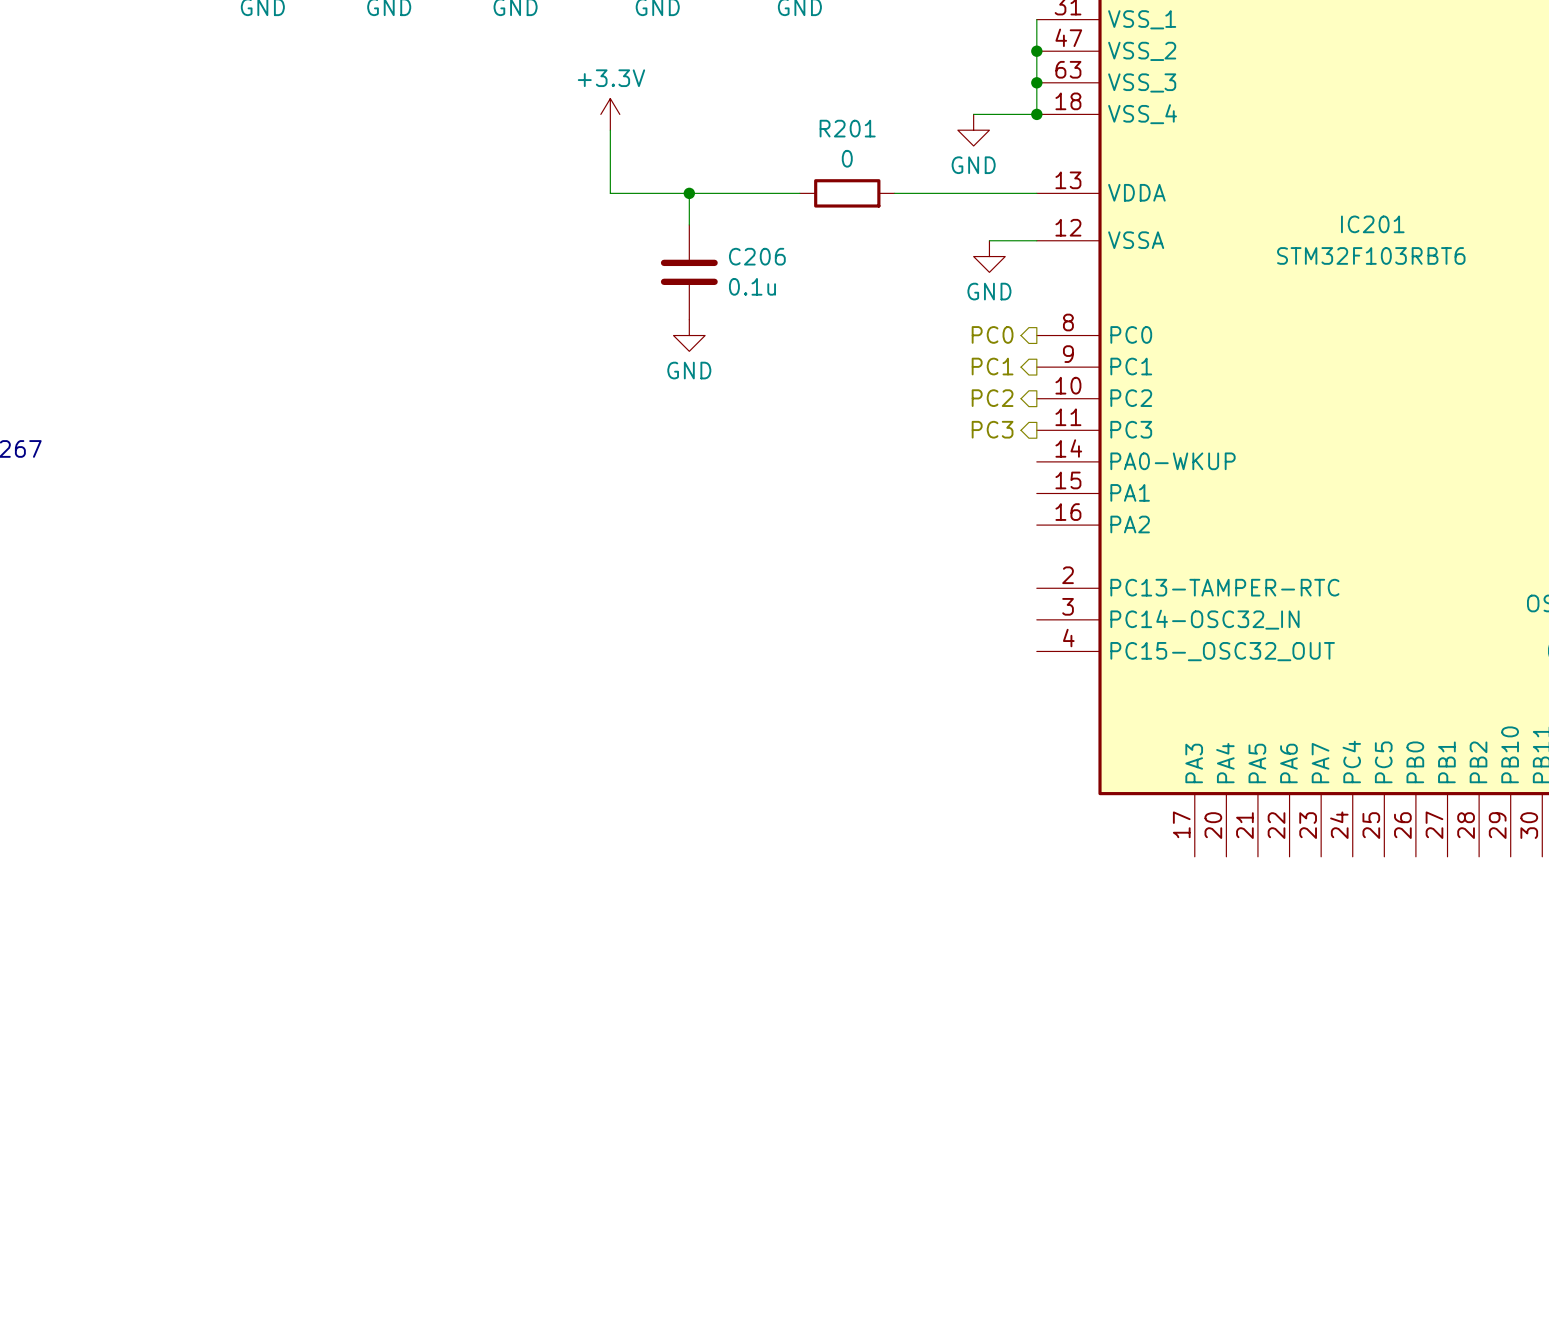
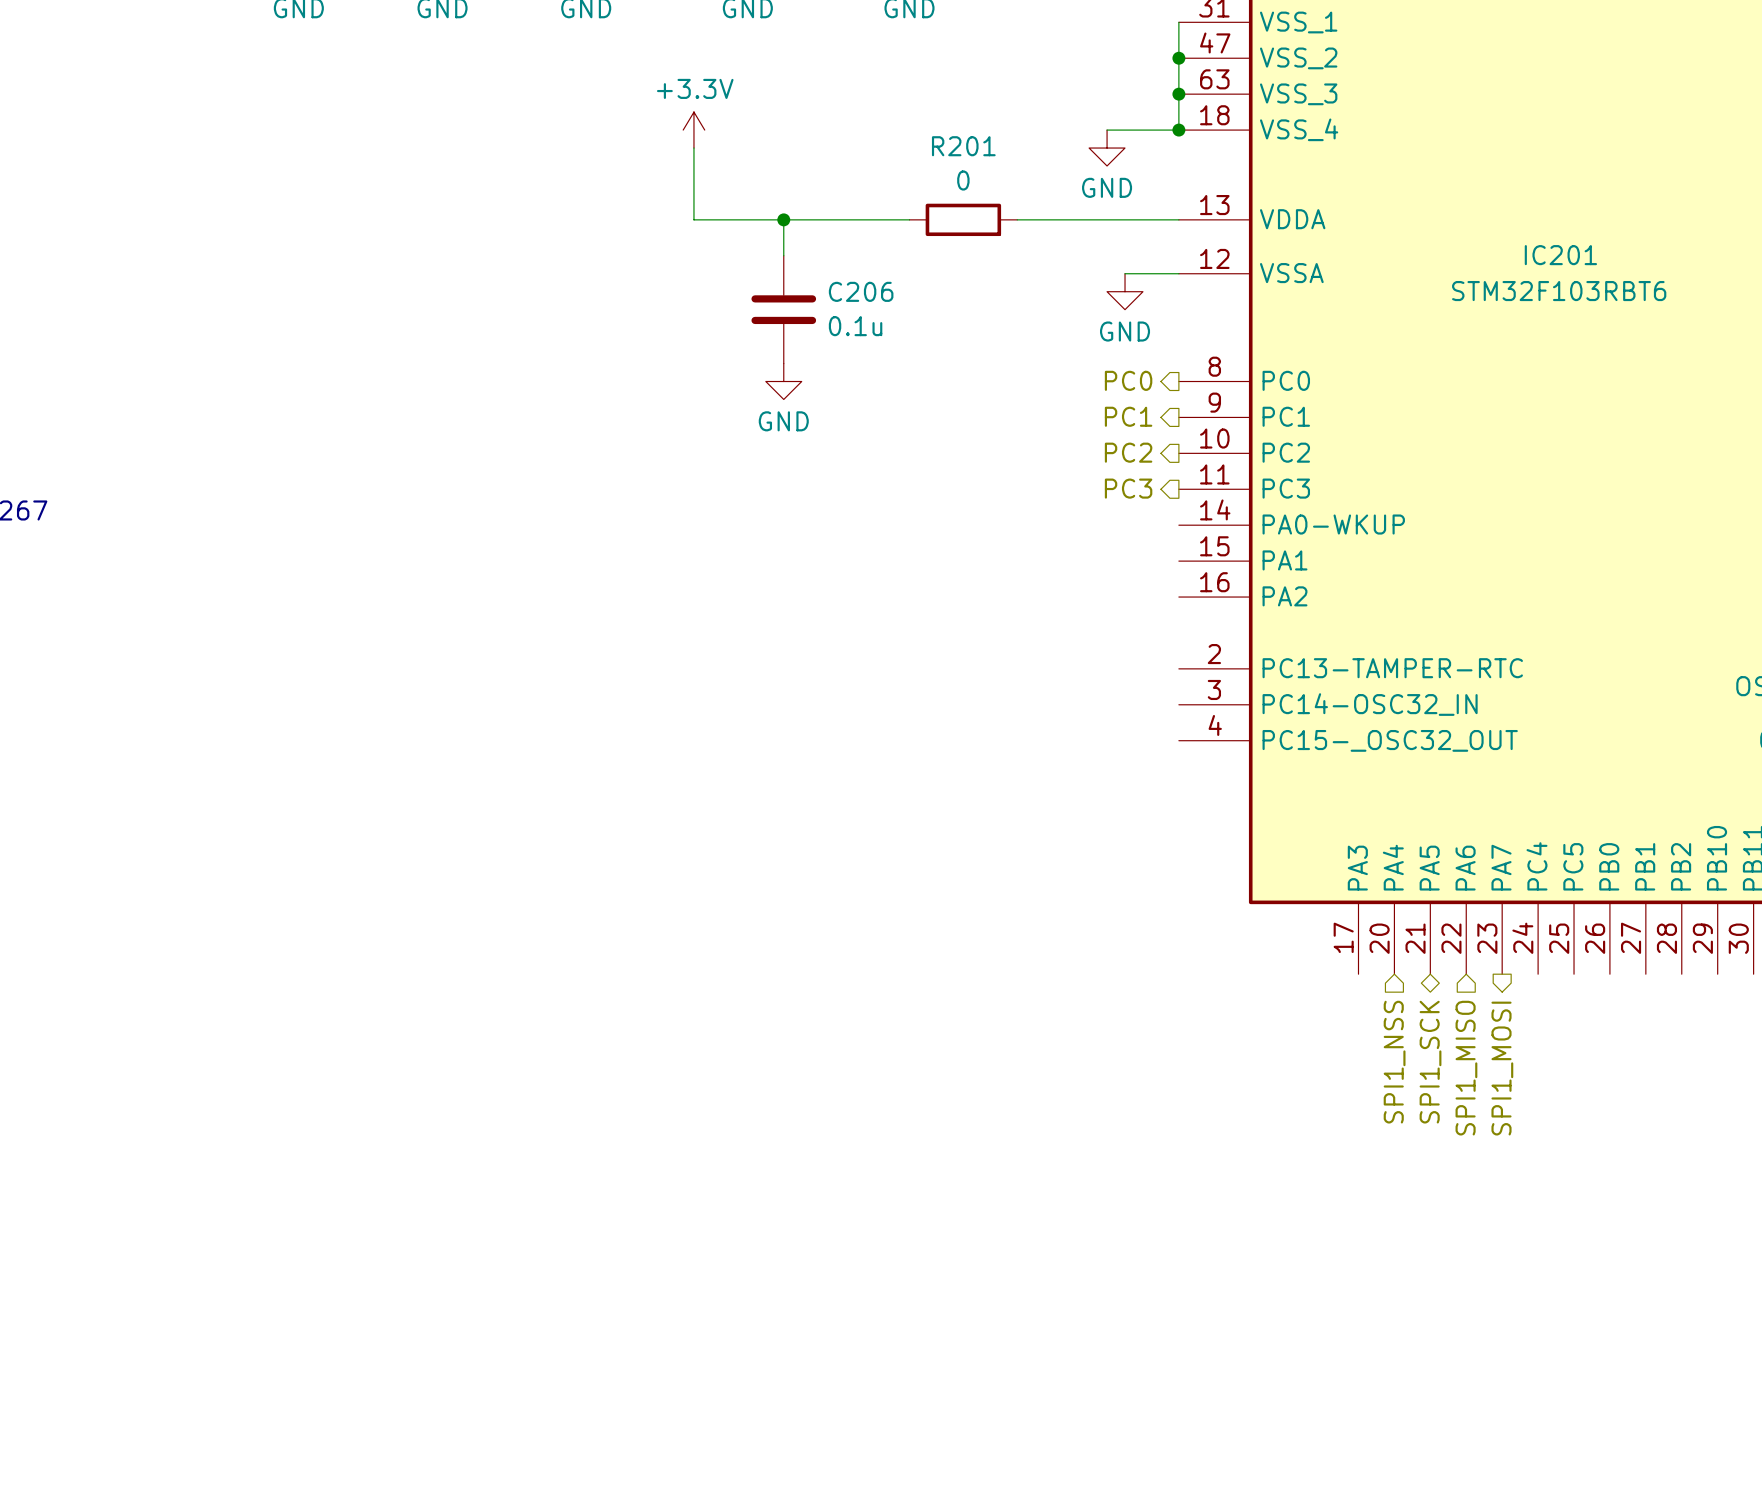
hierarchical label: none -> SPI1_NSS (1394, 1062)
hierarchical label: none -> SPI1_SCK (1430, 1062)
hierarchical label: none -> SPI1_MISO (1466, 1068)
hierarchical label: none -> SPI1_MOSI (1502, 1068)

